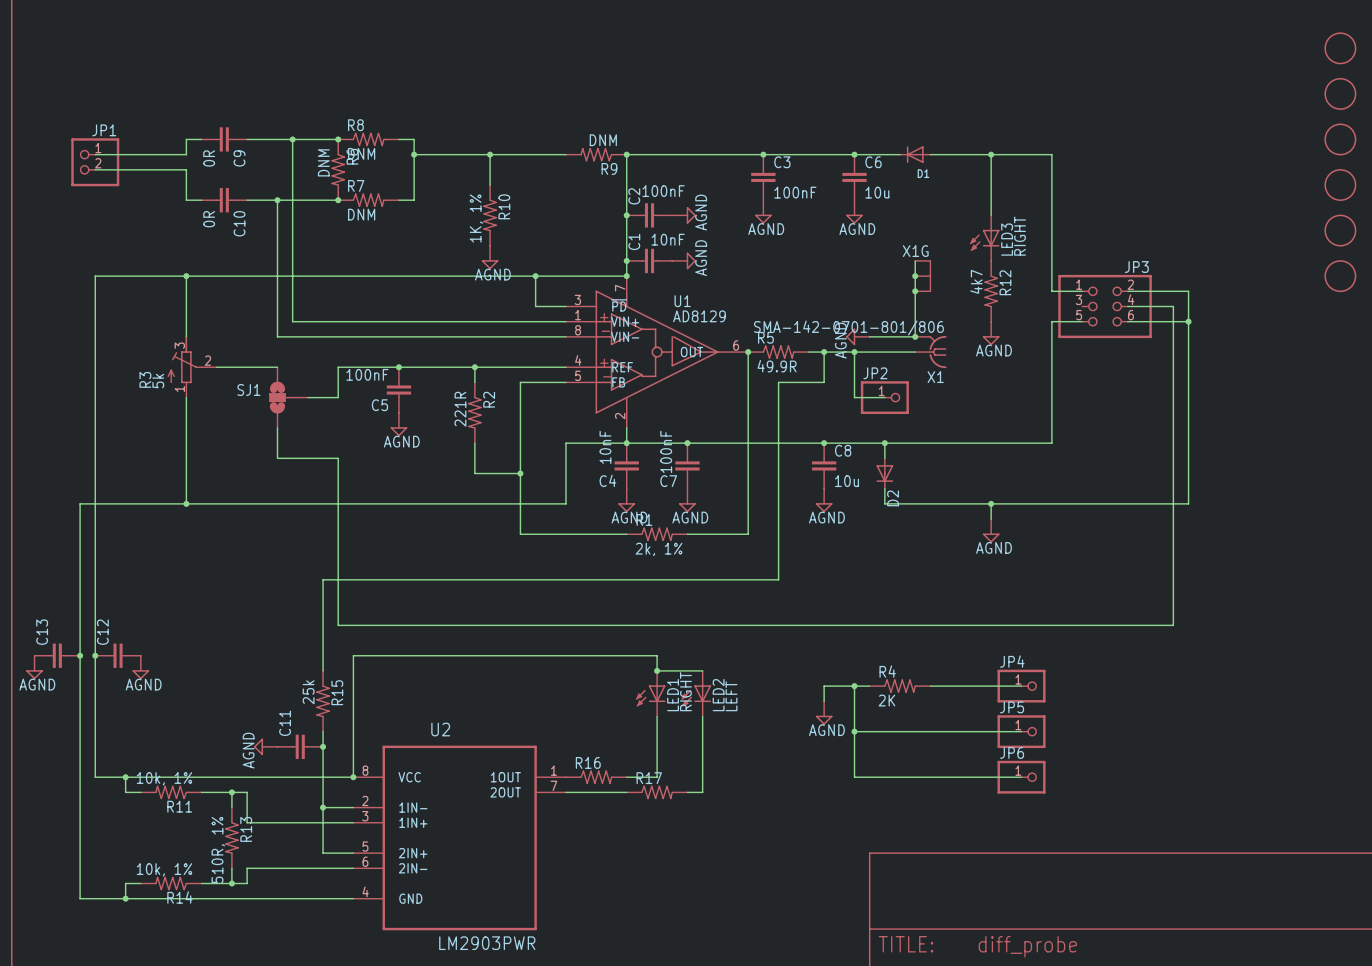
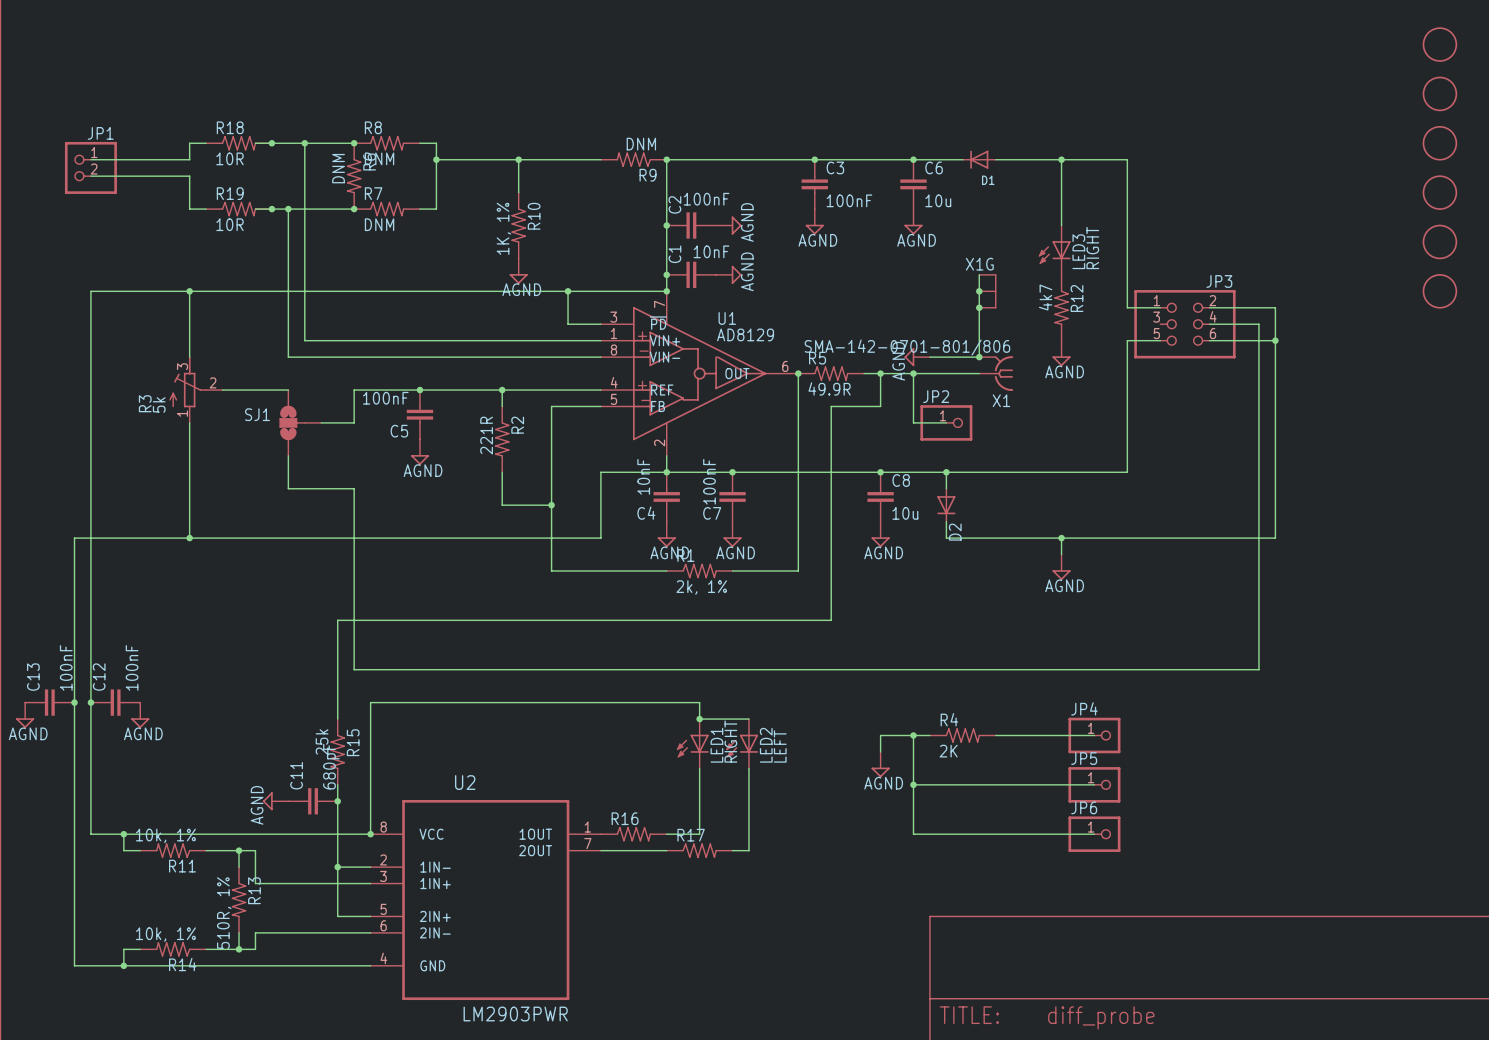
C9: 0R (224, 139) -> none
R18: none -> 10R (239, 143)
junction: none -> (271, 143)
C10: 0R (224, 200) -> none
R19: none -> 10R (239, 209)
junction: none -> (271, 209)
C13 value: none -> 100nF (66, 667)
C12 value: none -> 100nF (132, 667)
C11 value: none -> 680pF (331, 766)

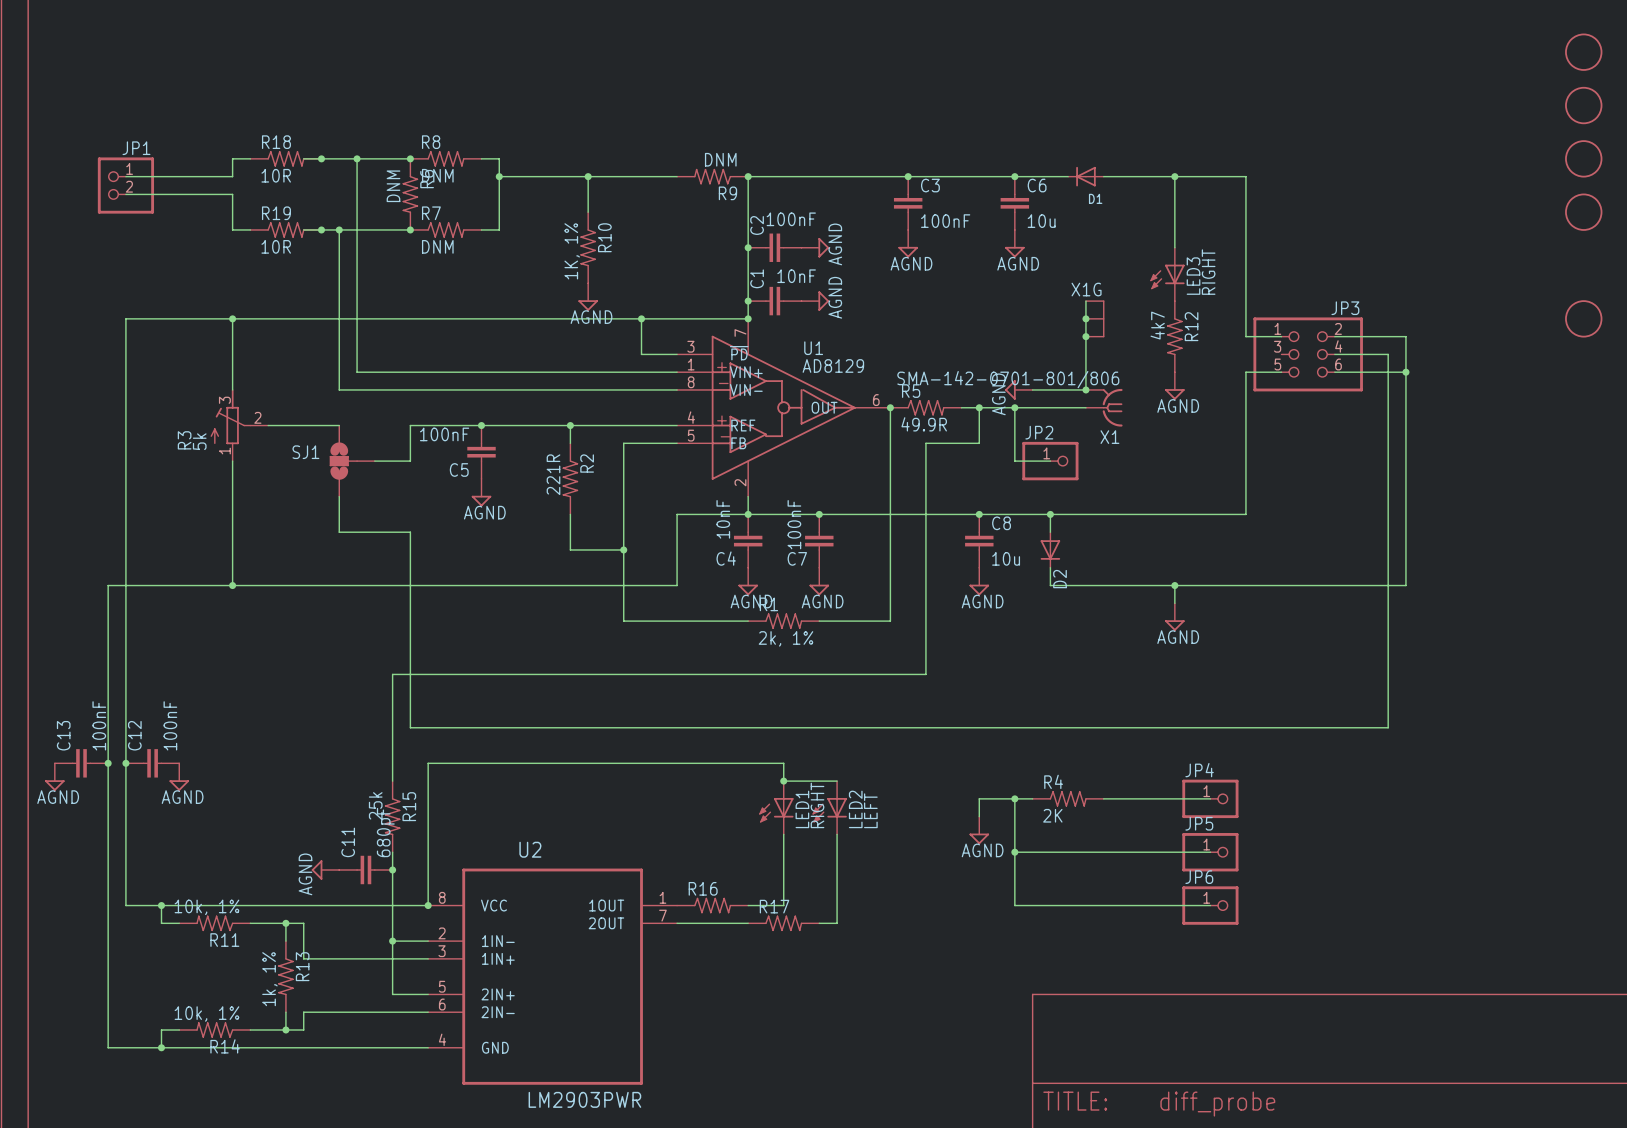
part: (1439, 241) -> none
R13 value: 510R, 1% (224, 913) -> 1k, 1% (269, 979)

